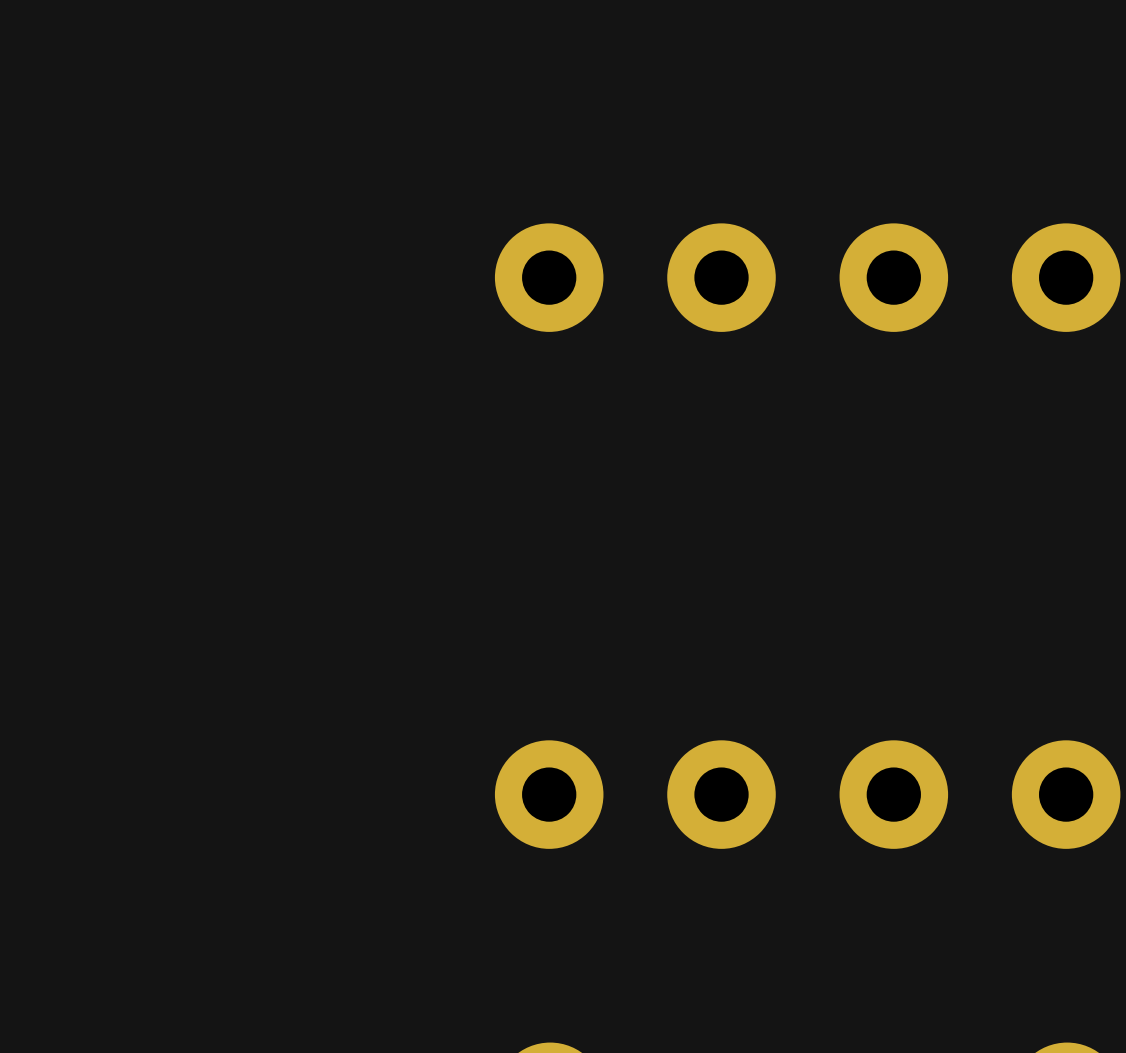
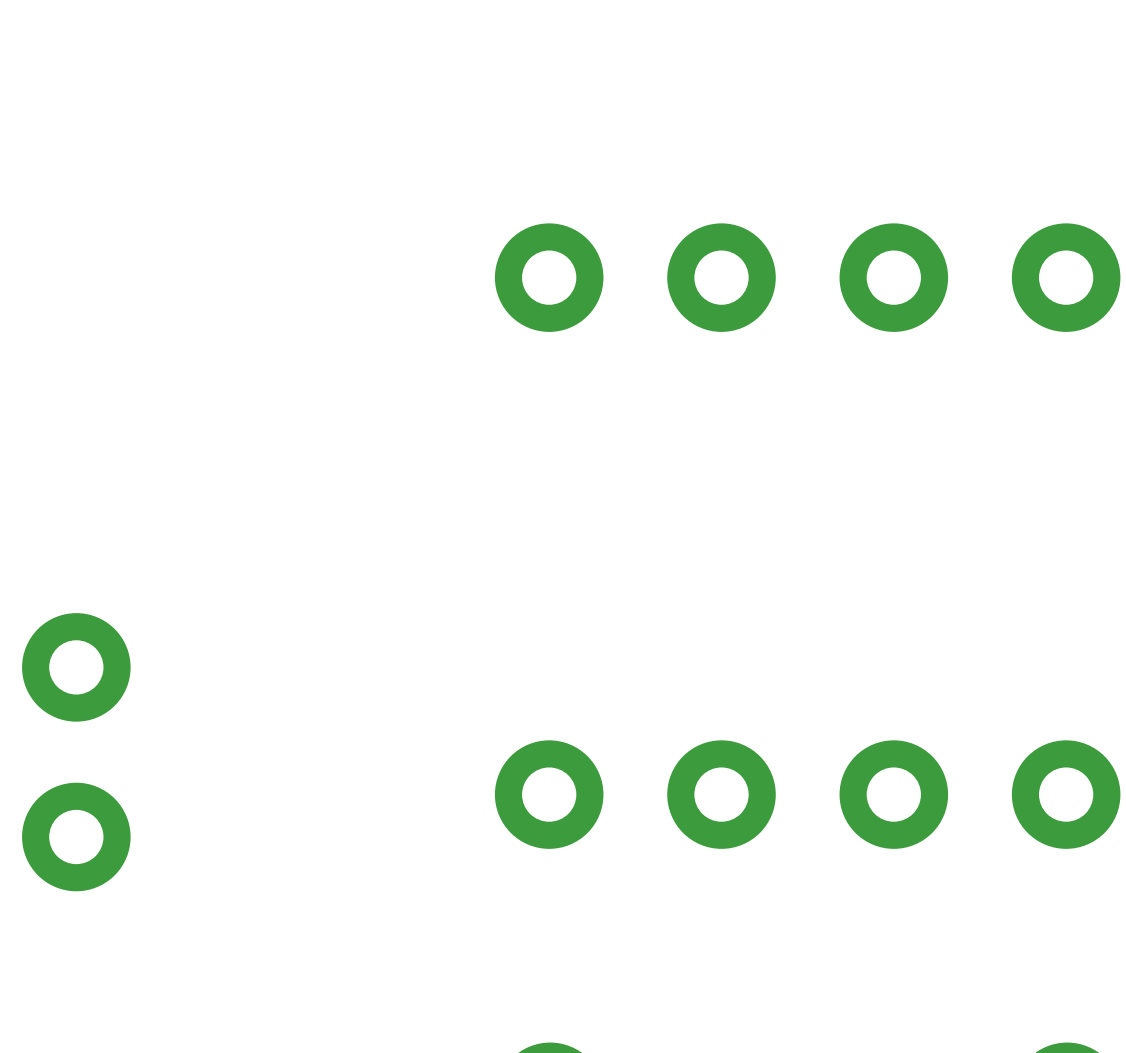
part: none -> (76, 752)

